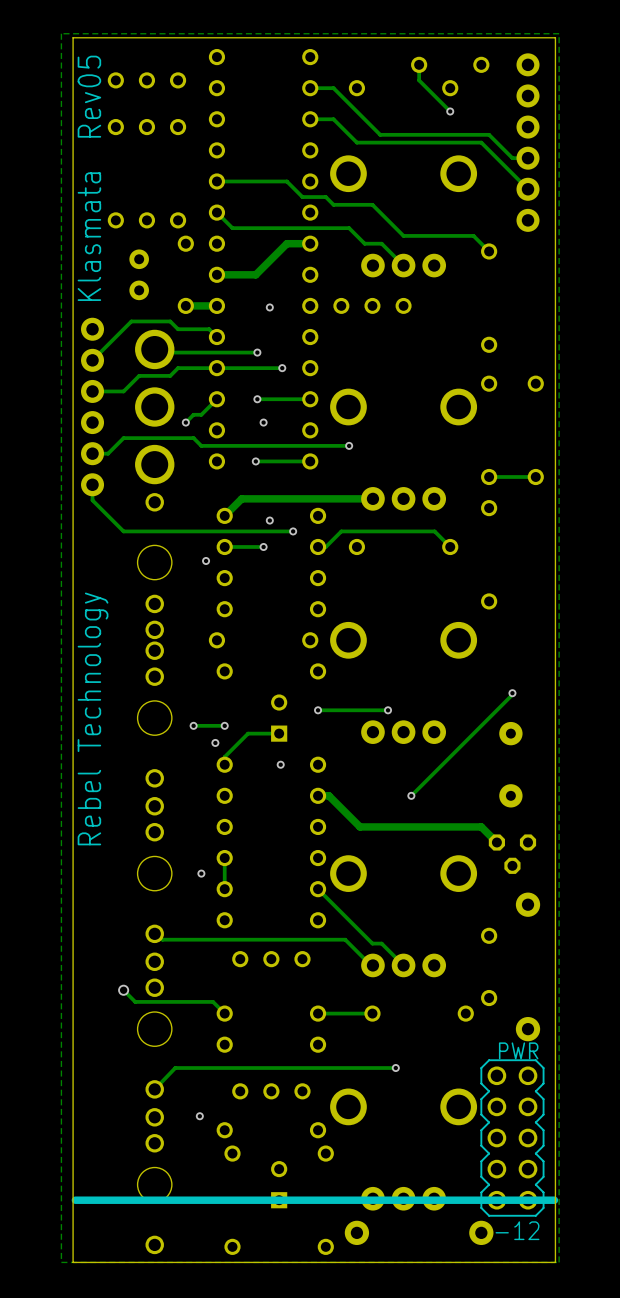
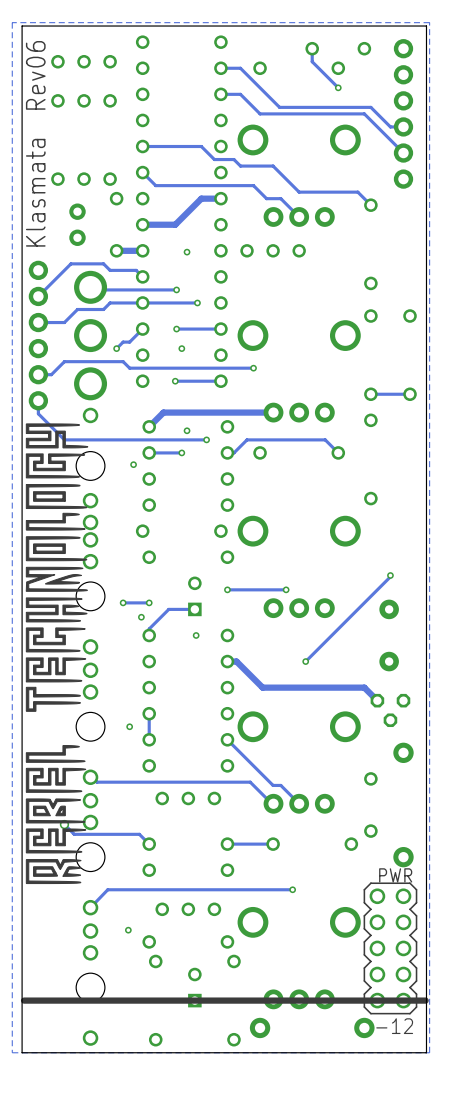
text: Rev05 (89, 96) -> Rev06 (35, 75)
drawing: none -> [25, 423, 89, 712]
text: Rebel Technology (93, 718) -> none
drawing: none -> [25, 745, 87, 885]

